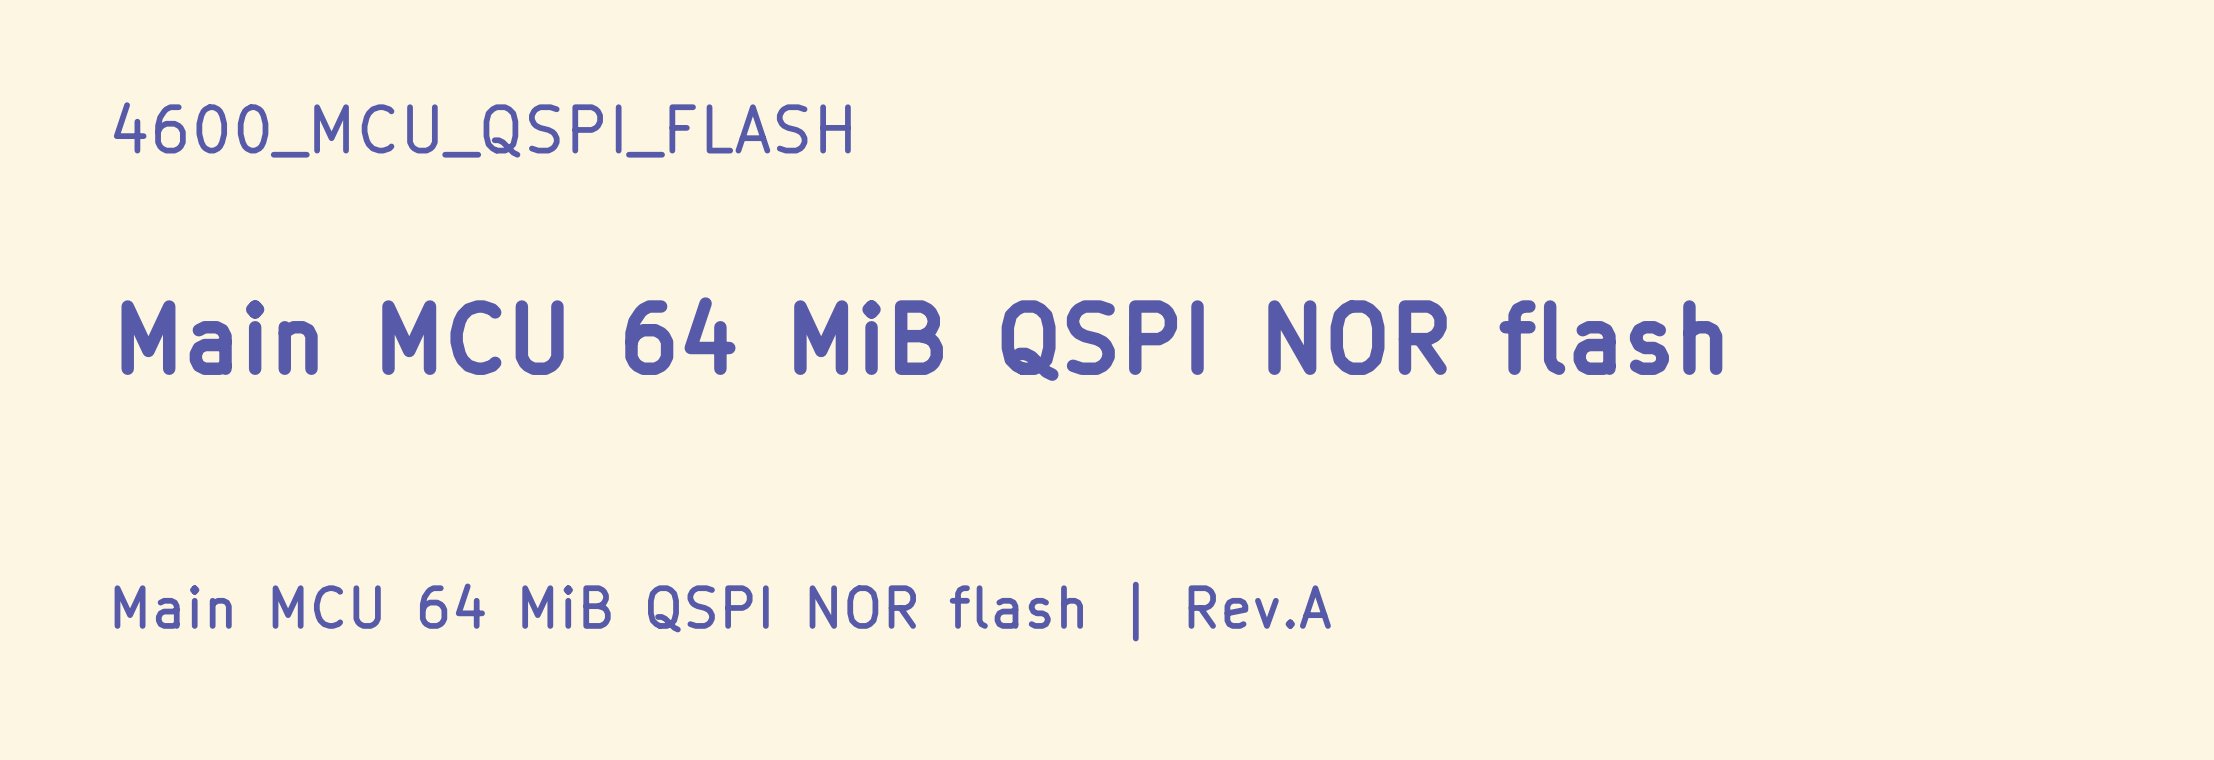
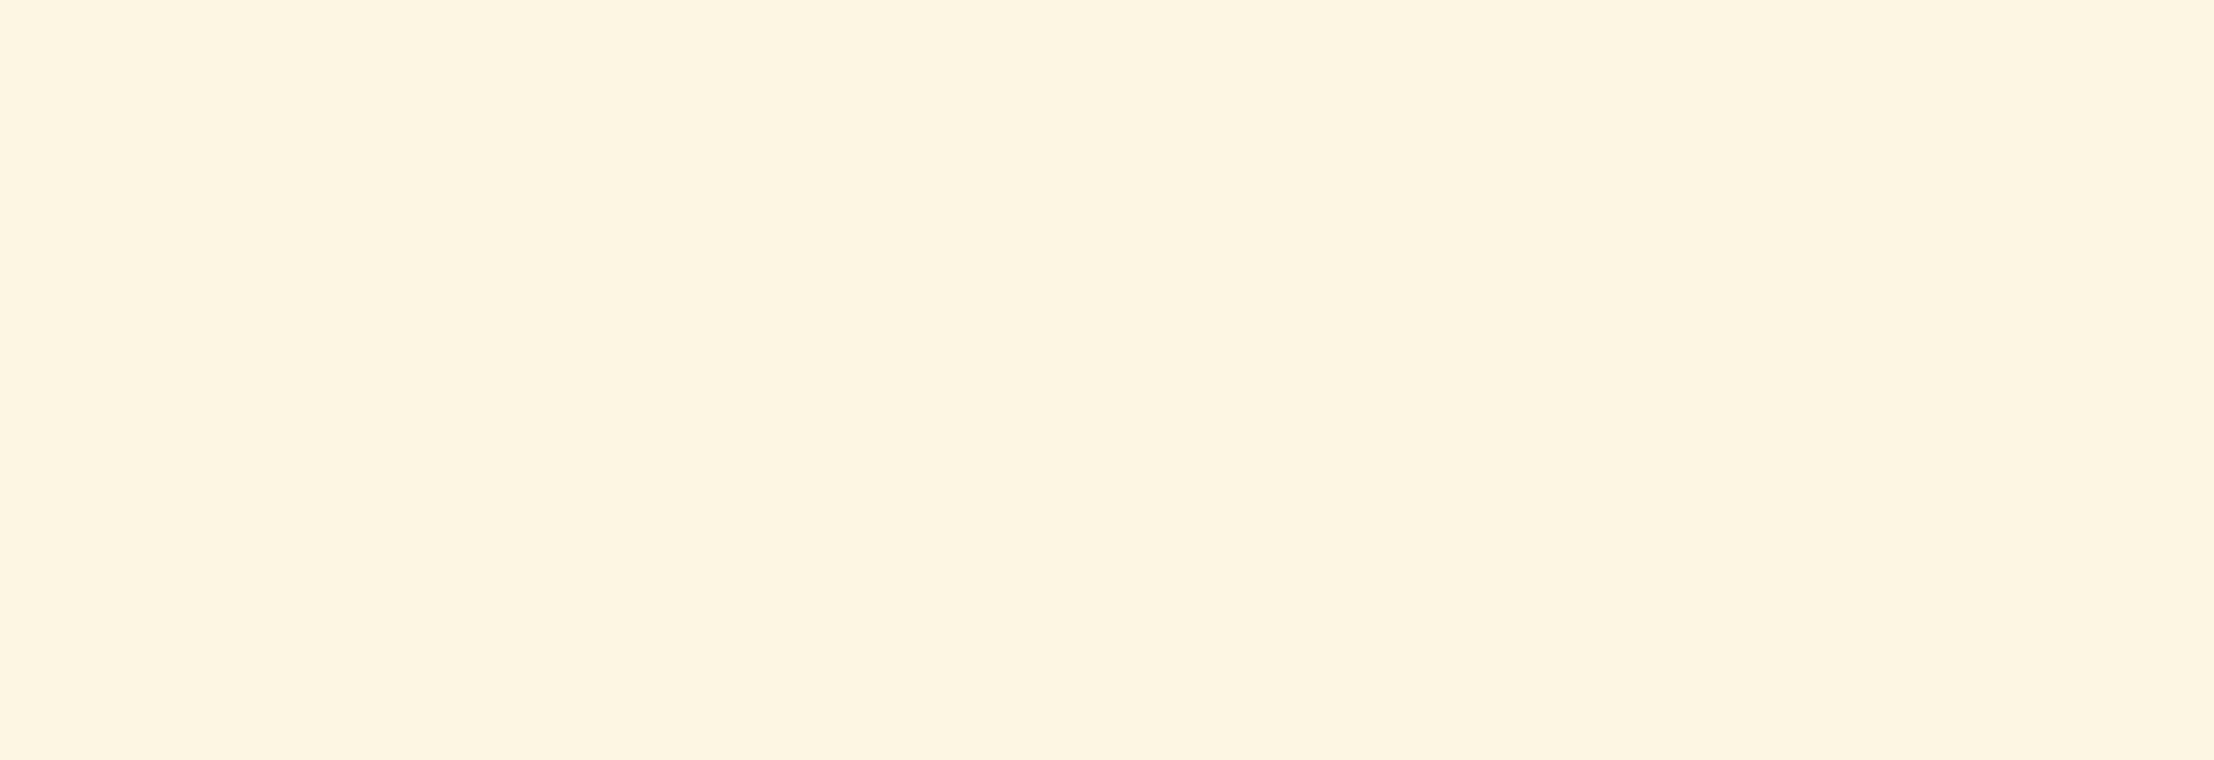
text: 4600_MCU_QSPI_FLASH (482, 129) -> none
text: Main MCU 64 MiB QSPI NOR flash (921, 339) -> none
text: Main MCU 64 MiB QSPI NOR flash | Rev.A (722, 611) -> none

